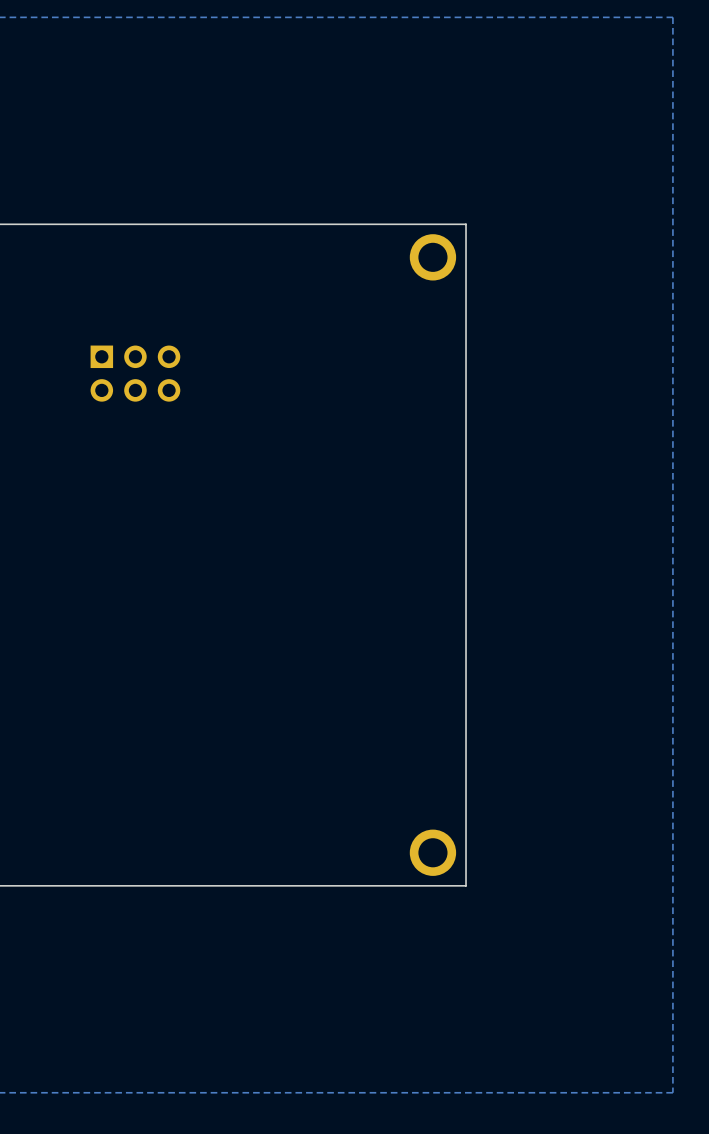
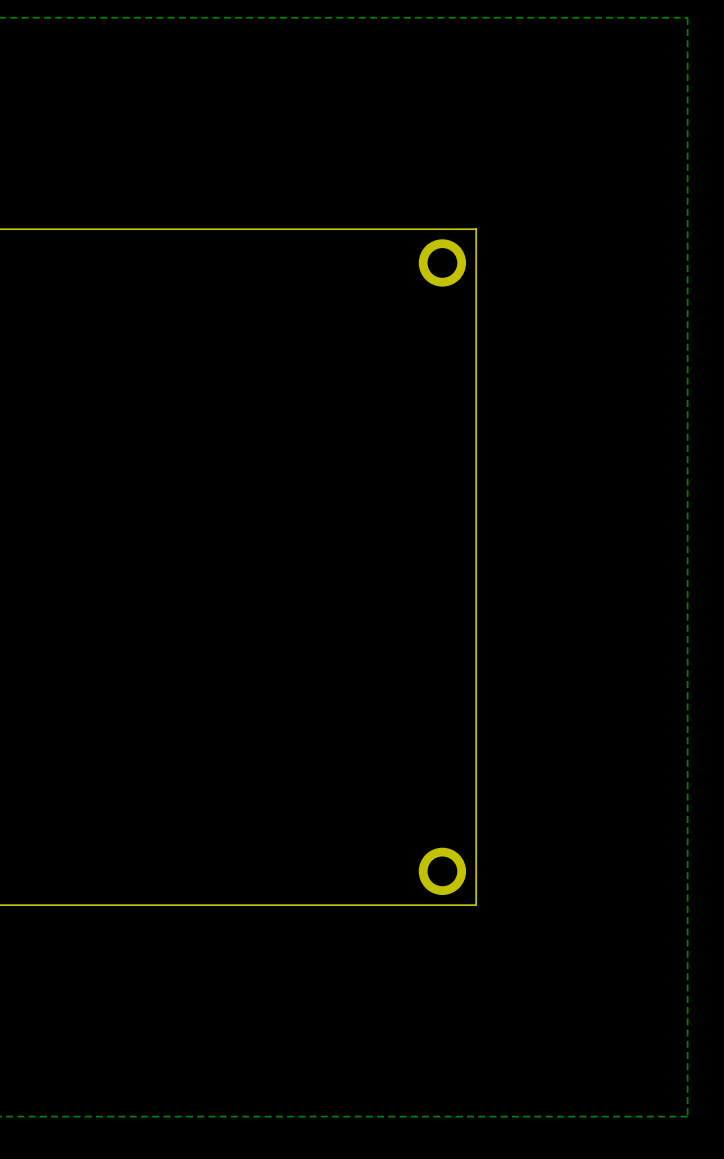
part: (135, 373) -> none

